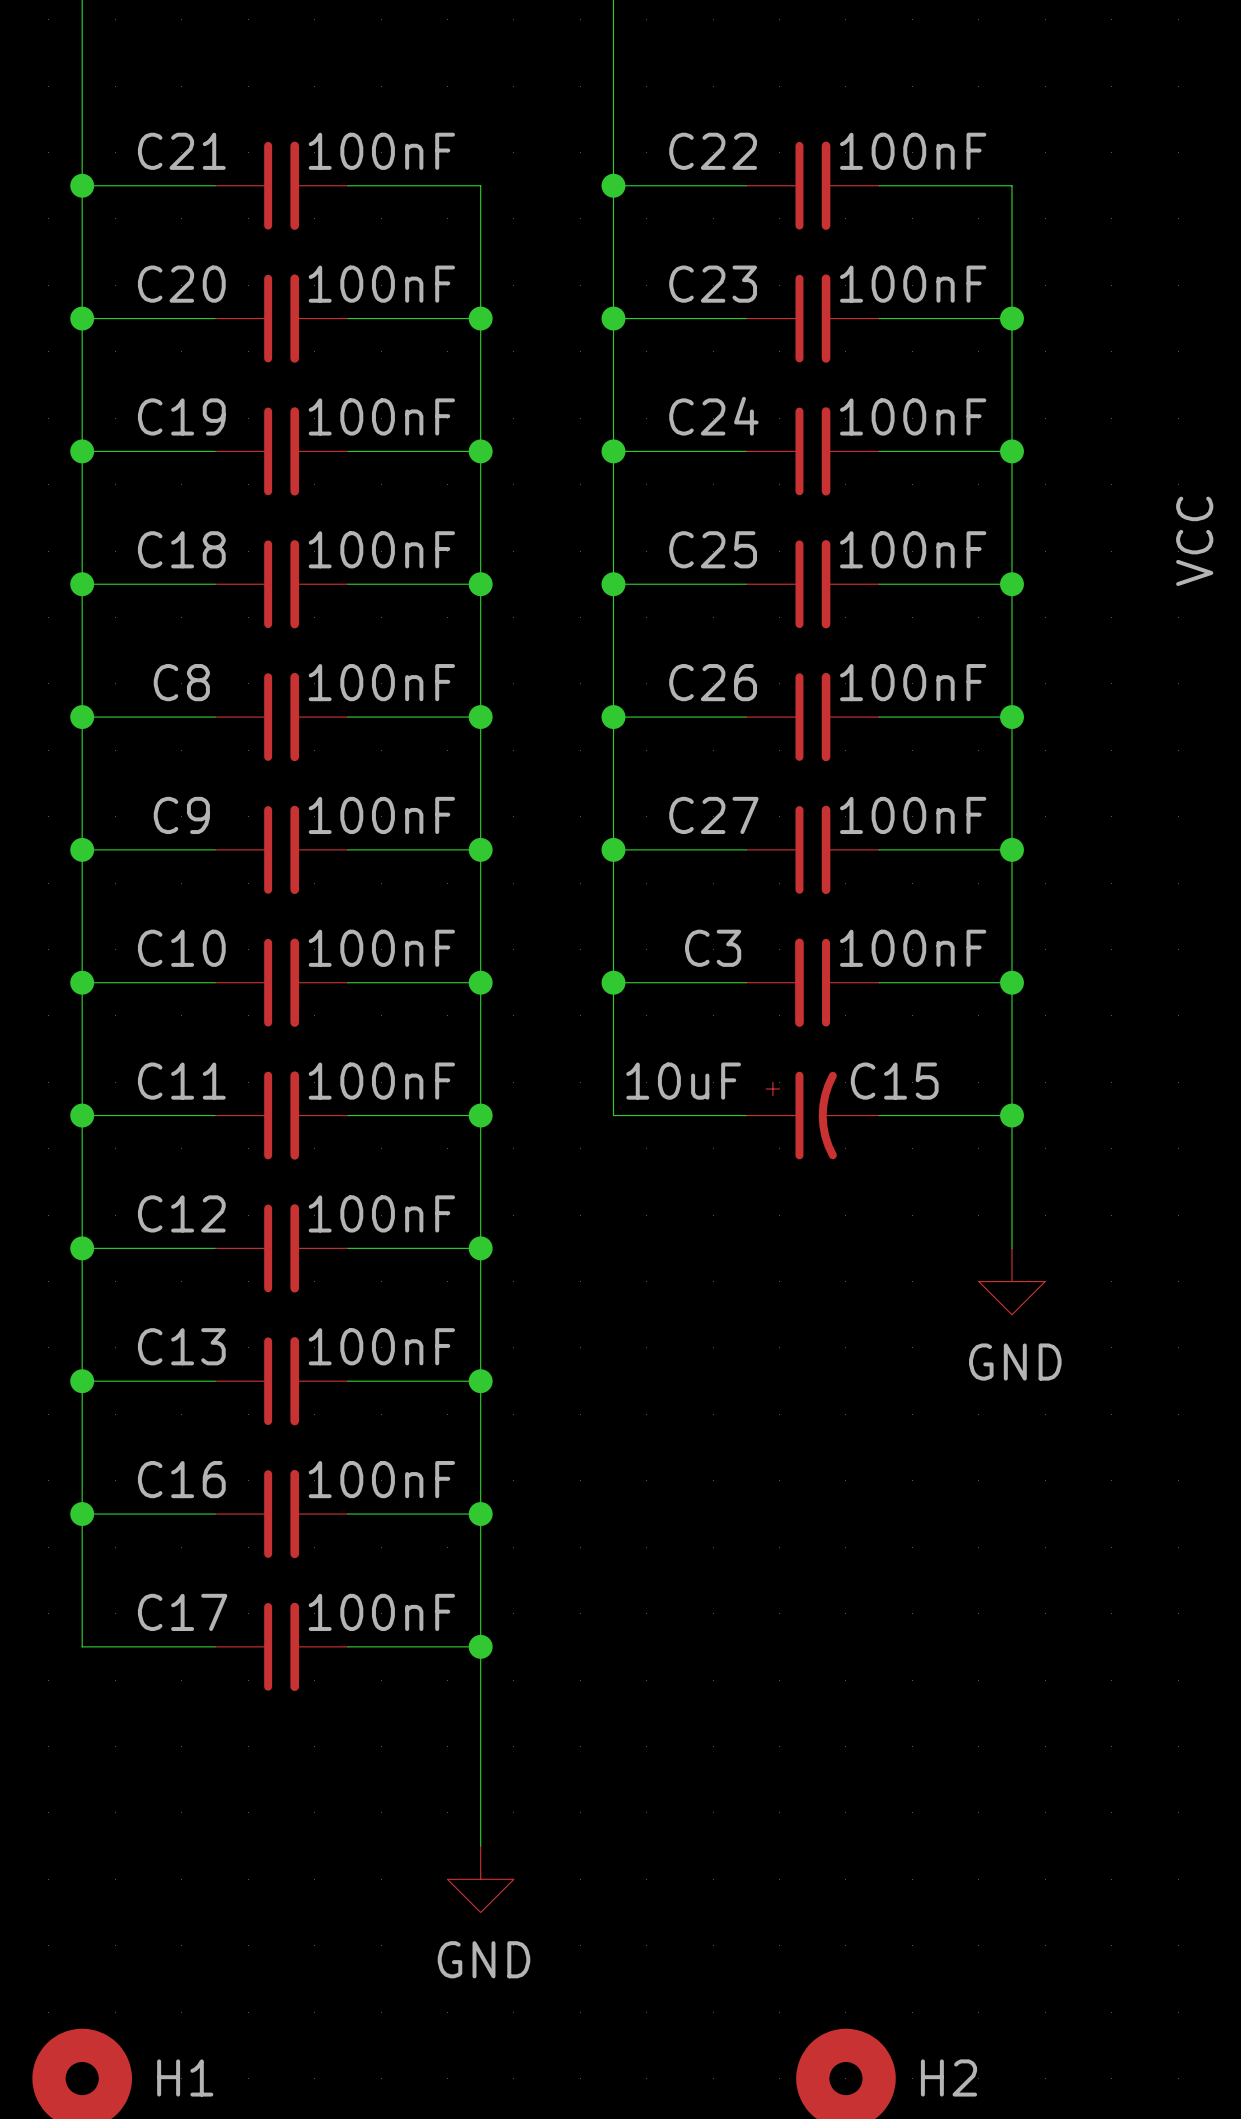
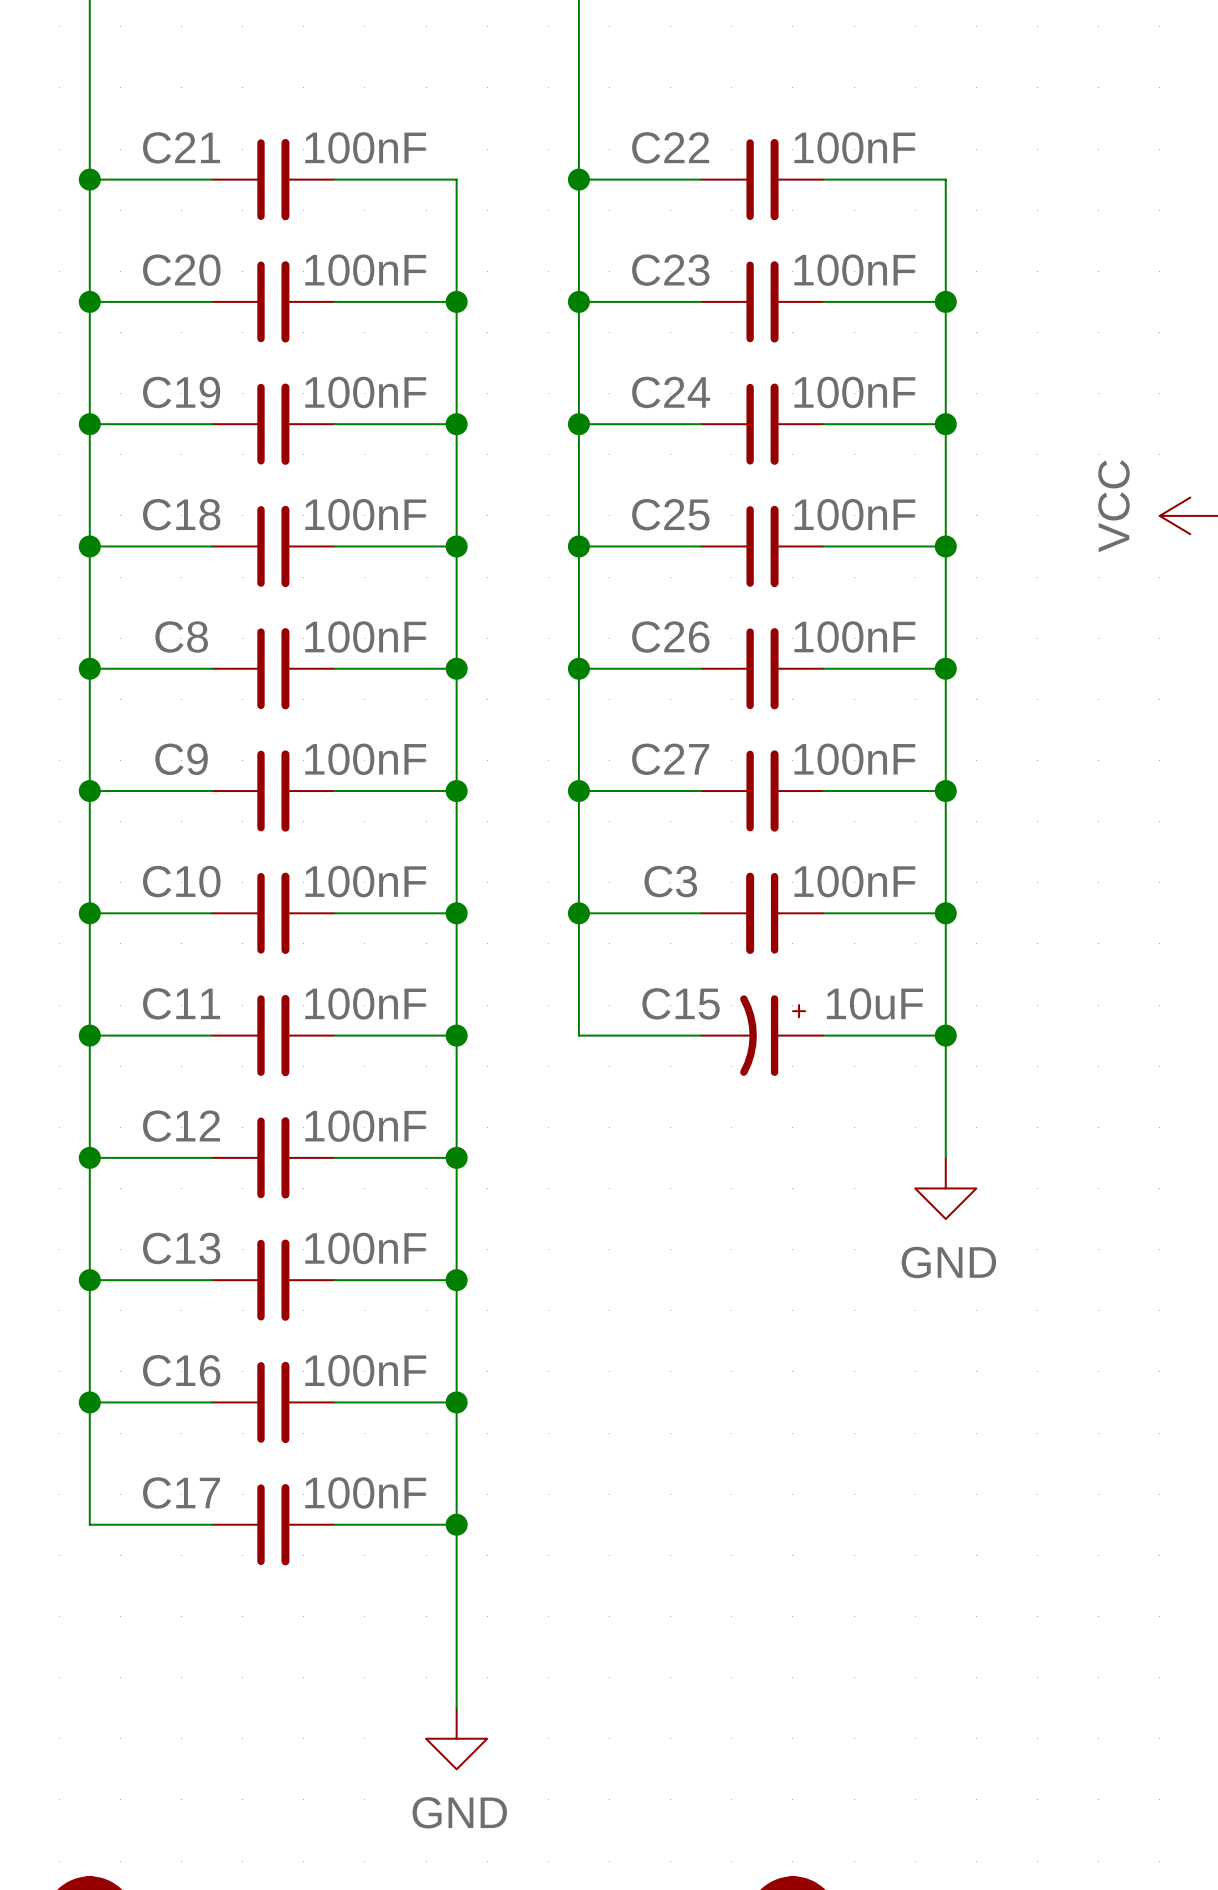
C15 flip: as is (801, 1115) -> left-right (772, 1035)

